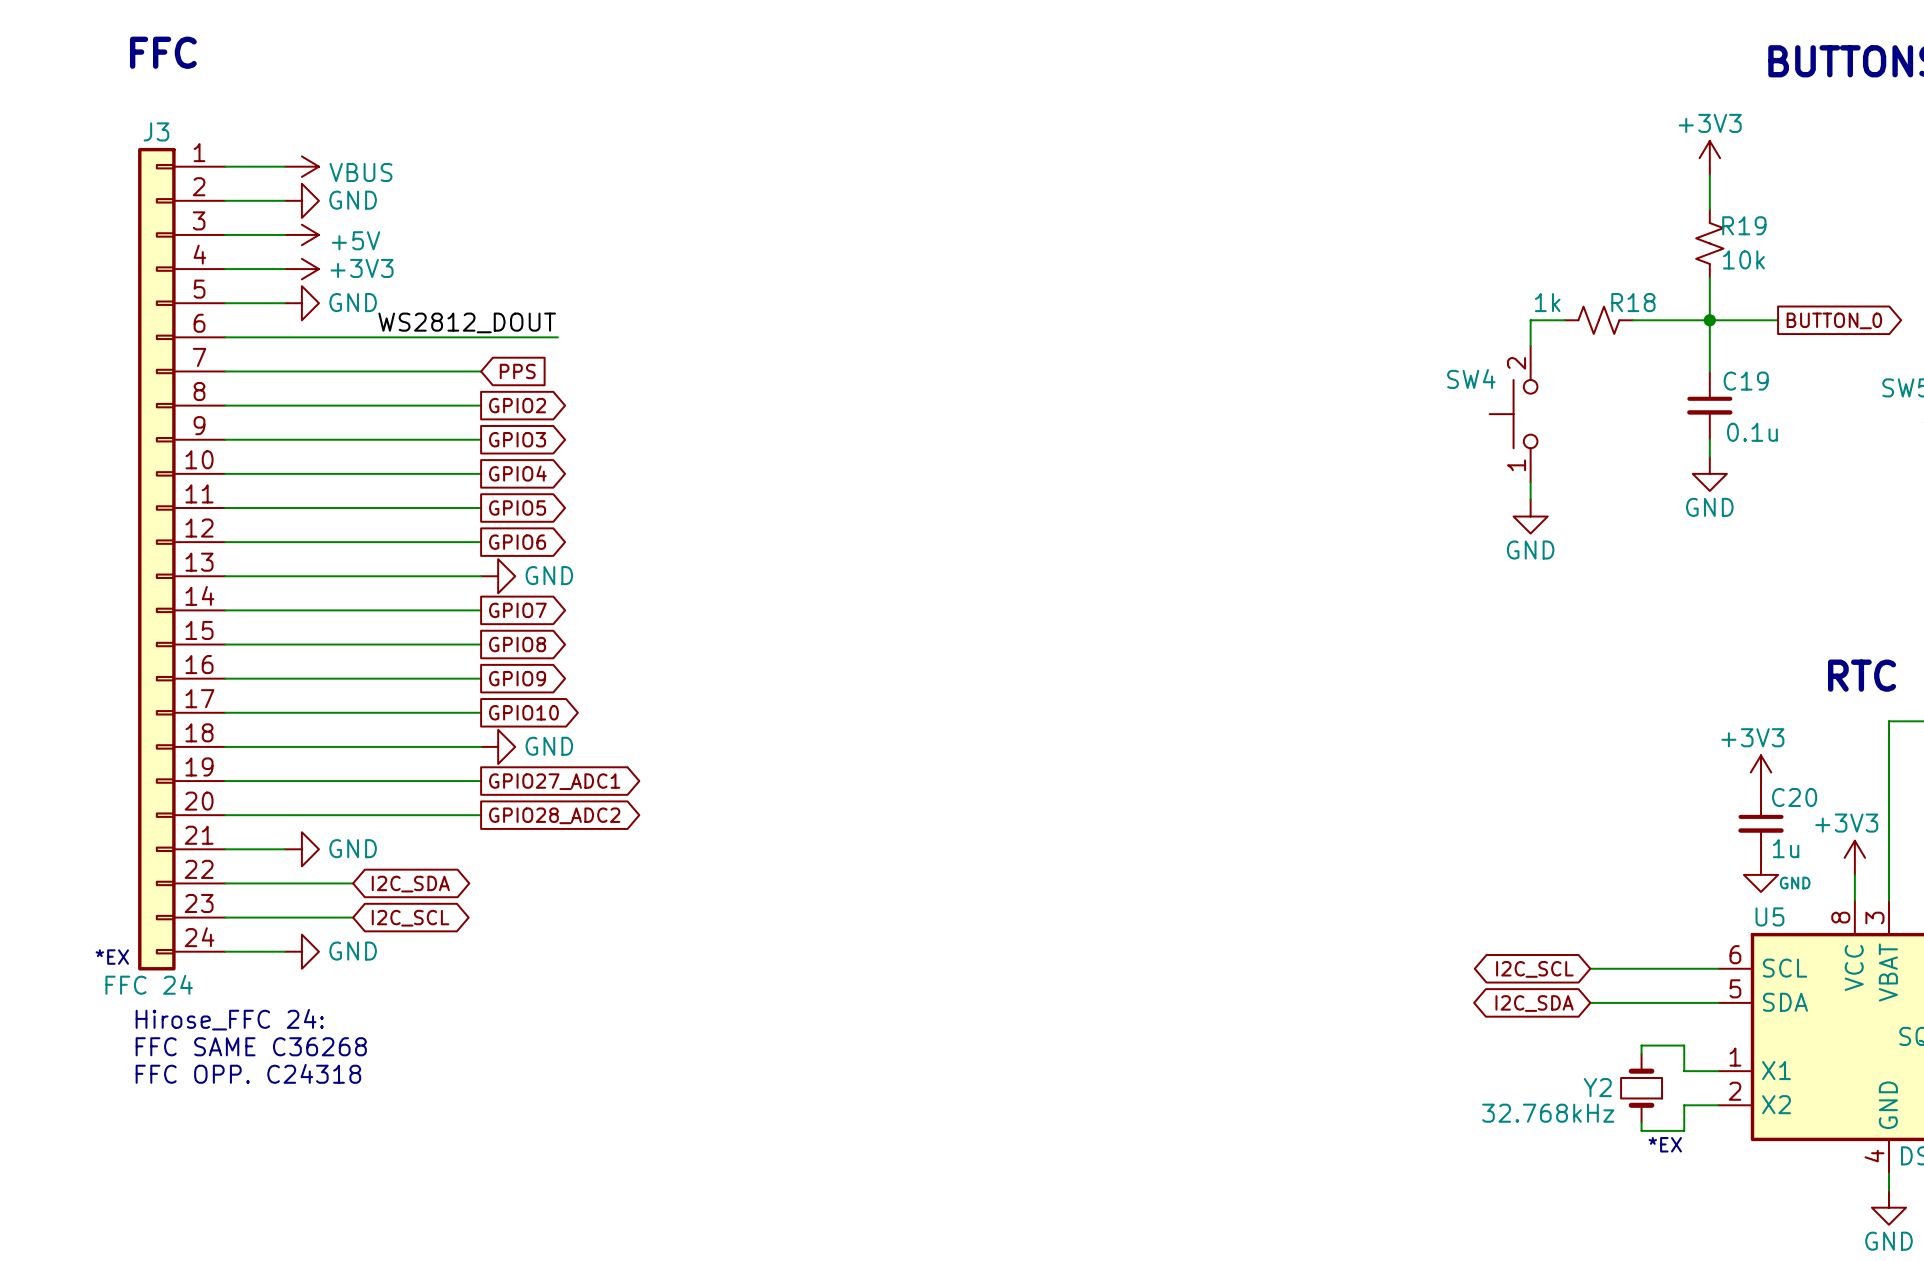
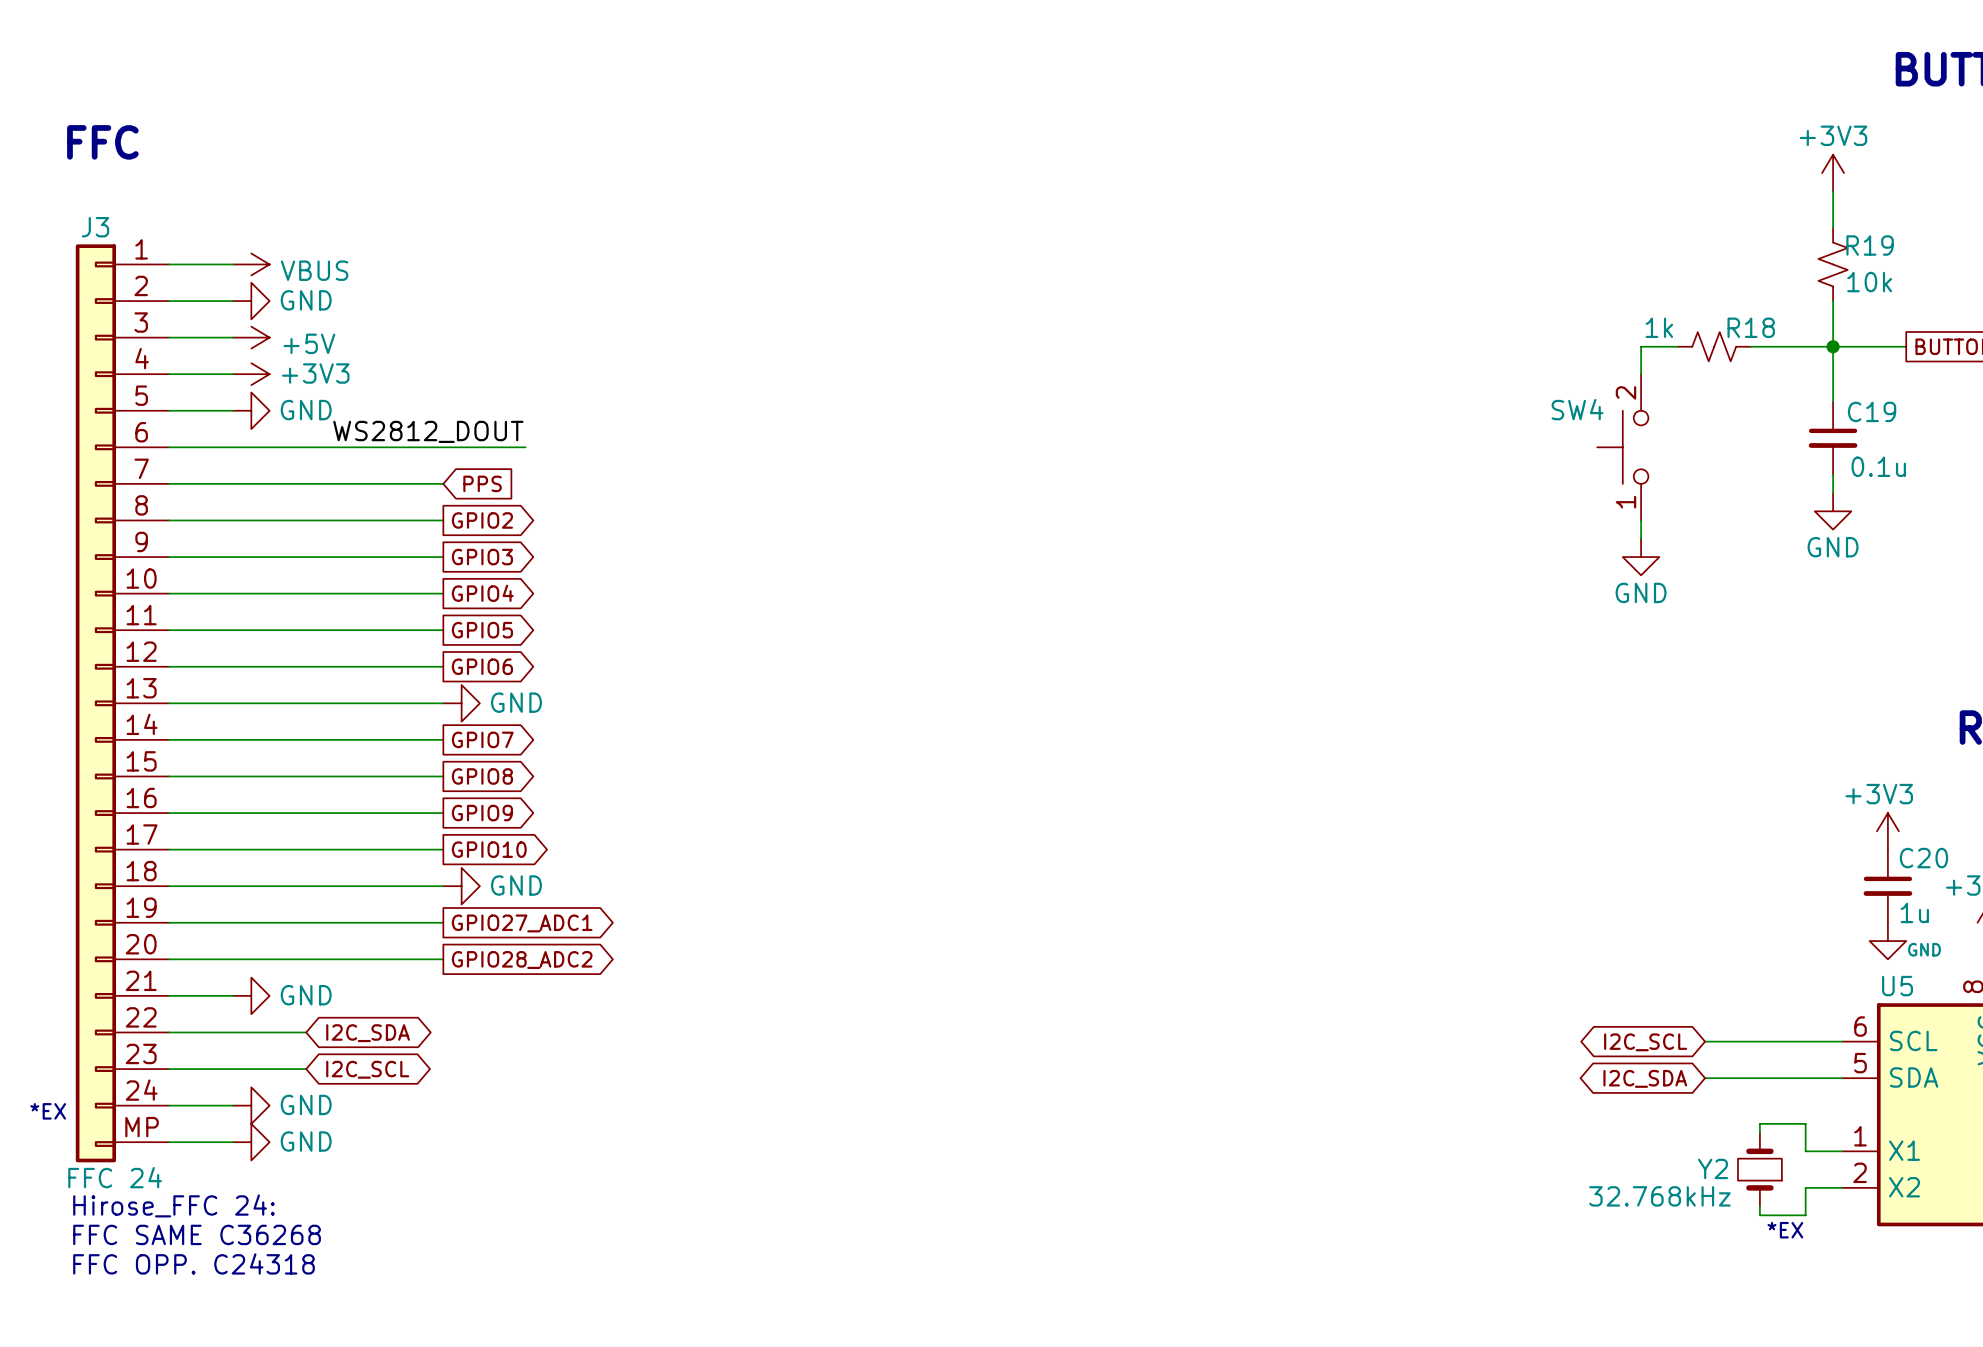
text position: FFC (163, 52) -> FFC (102, 142)
J3 symbol: [138, 147, 226, 971] -> [75, 244, 170, 1163]
wire: (225, 166) (284, 166) -> (169, 264) (233, 264)
power symbol position: VBUS (301, 166) -> VBUS (251, 264)
wire: (225, 200) (284, 200) -> (169, 301) (233, 301)
power symbol: GND (301, 200) -> none
wire: (225, 234) (284, 234) -> (169, 337) (233, 337)
power symbol position: +5V (301, 234) -> +5V (251, 337)
wire: (225, 269) (284, 269) -> (169, 374) (233, 374)
power symbol position: +3V3 (301, 269) -> +3V3 (251, 374)
power symbol: none -> GND (251, 301)
wire: (225, 303) (284, 303) -> (169, 410) (233, 410)
power symbol: GND (301, 303) -> none
label position: WS2812_DOUT (467, 322) -> WS2812_DOUT (428, 431)
wire: (225, 337) (557, 337) -> (169, 447) (525, 447)
wire: (225, 371) (481, 371) -> (169, 483) (443, 483)
global label position: PPS (517, 371) -> PPS (482, 483)
power symbol: none -> GND (251, 410)
wire: (225, 405) (481, 405) -> (169, 520) (443, 520)
global label position: GPIO2 (517, 405) -> GPIO2 (482, 520)
wire: (225, 439) (481, 439) -> (169, 557) (443, 557)
global label position: GPIO3 (517, 439) -> GPIO3 (482, 557)
wire: (225, 473) (481, 473) -> (169, 593) (443, 593)
global label position: GPIO4 (517, 473) -> GPIO4 (482, 593)
wire: (225, 508) (481, 508) -> (169, 630) (443, 630)
global label position: GPIO5 (517, 508) -> GPIO5 (482, 630)
wire: (225, 542) (481, 542) -> (169, 666) (443, 666)
global label position: GPIO6 (517, 542) -> GPIO6 (482, 666)
wire: (225, 576) (481, 576) -> (169, 703) (443, 703)
power symbol: GND (498, 576) -> none
wire: (225, 610) (481, 610) -> (169, 739) (443, 739)
global label position: GPIO7 (517, 610) -> GPIO7 (482, 739)
wire: (225, 644) (481, 644) -> (169, 776) (443, 776)
global label position: GPIO8 (517, 644) -> GPIO8 (482, 776)
power symbol: none -> GND (461, 703)
wire: (225, 678) (481, 678) -> (169, 813) (443, 813)
global label position: GPIO9 (517, 678) -> GPIO9 (482, 813)
wire: (225, 712) (481, 712) -> (169, 849) (443, 849)
global label position: GPIO10 (523, 712) -> GPIO10 (489, 849)
wire: (225, 746) (481, 746) -> (169, 886) (443, 886)
power symbol: GND (498, 746) -> none
wire: (225, 781) (481, 781) -> (169, 922) (443, 922)
global label position: GPIO27_ADC1 (554, 781) -> GPIO27_ADC1 (522, 923)
wire: (225, 815) (481, 815) -> (169, 959) (443, 959)
global label position: GPIO28_ADC2 (554, 815) -> GPIO28_ADC2 (522, 960)
power symbol: none -> GND (461, 886)
wire: (225, 849) (284, 849) -> (169, 995) (233, 995)
power symbol: GND (301, 849) -> none
wire: (225, 883) (353, 883) -> (169, 1032) (306, 1032)
global label position: I2C_SDA (410, 884) -> I2C_SDA (368, 1033)
wire: (225, 917) (353, 917) -> (169, 1069) (306, 1069)
global label position: I2C_SCL (410, 918) -> I2C_SCL (367, 1069)
power symbol: none -> GND (251, 995)
wire: (225, 951) (284, 951) -> (169, 1105) (233, 1105)
power symbol: GND (301, 951) -> none
text position: *EX (112, 957) -> *EX (48, 1111)
J3 value position: FFC 24 (149, 984) -> FFC 24 (115, 1177)
text position: Hirose_FFC 24: (229, 1019) -> Hirose_FFC 24: (173, 1205)
power symbol: none -> GND (251, 1105)
text position: FFC SAME C36268 (251, 1046) -> FFC SAME C36268 (197, 1234)
wire: none -> (169, 1142) (233, 1142)
power symbol: none -> GND (251, 1142)
text position: FFC OPP. C24318 (248, 1073) -> FFC OPP. C24318 (194, 1263)

